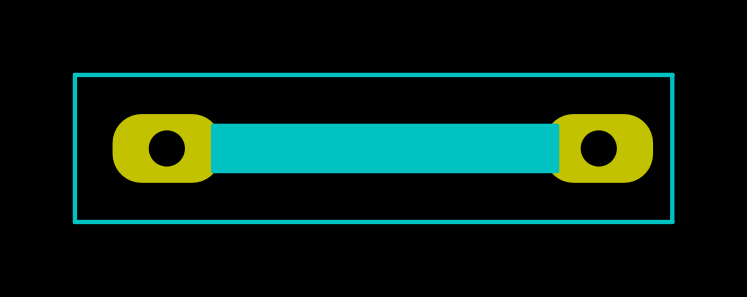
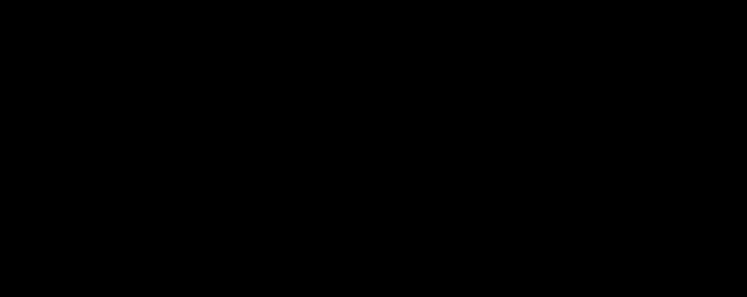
part: (373, 148) -> none

